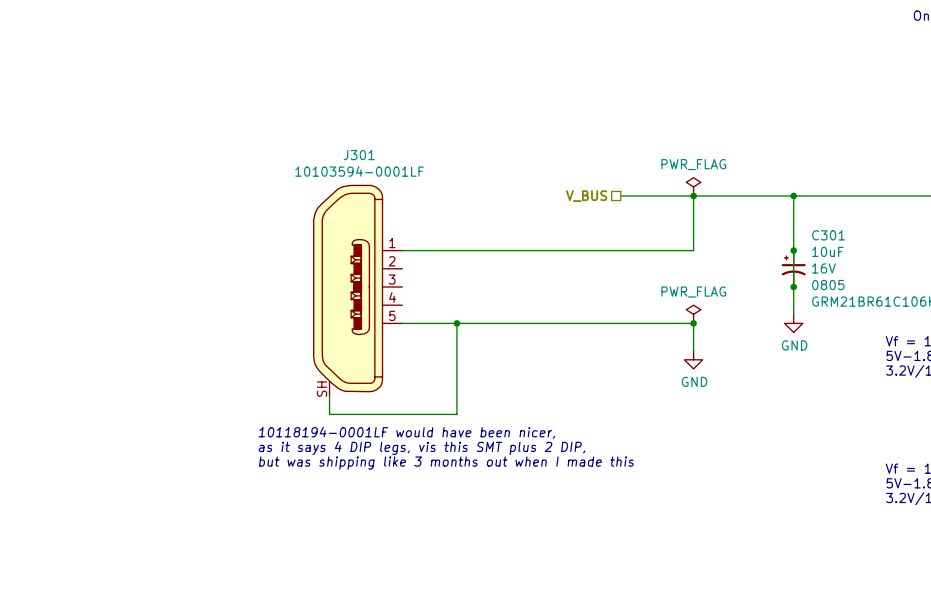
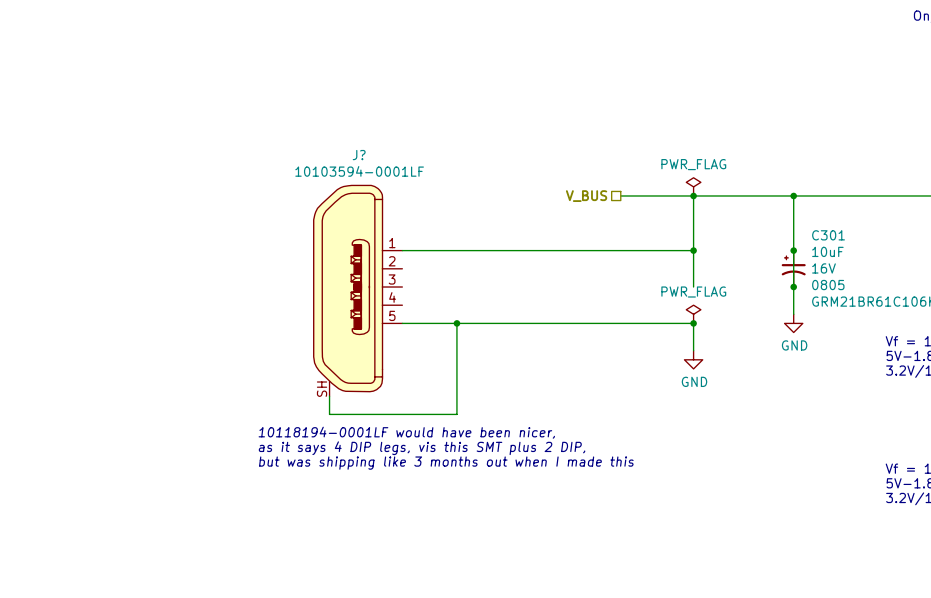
J301 name: J301 (359, 155) -> J? (359, 155)
wire: none -> (693, 250) (693, 287)
junction: none -> (693, 250)

